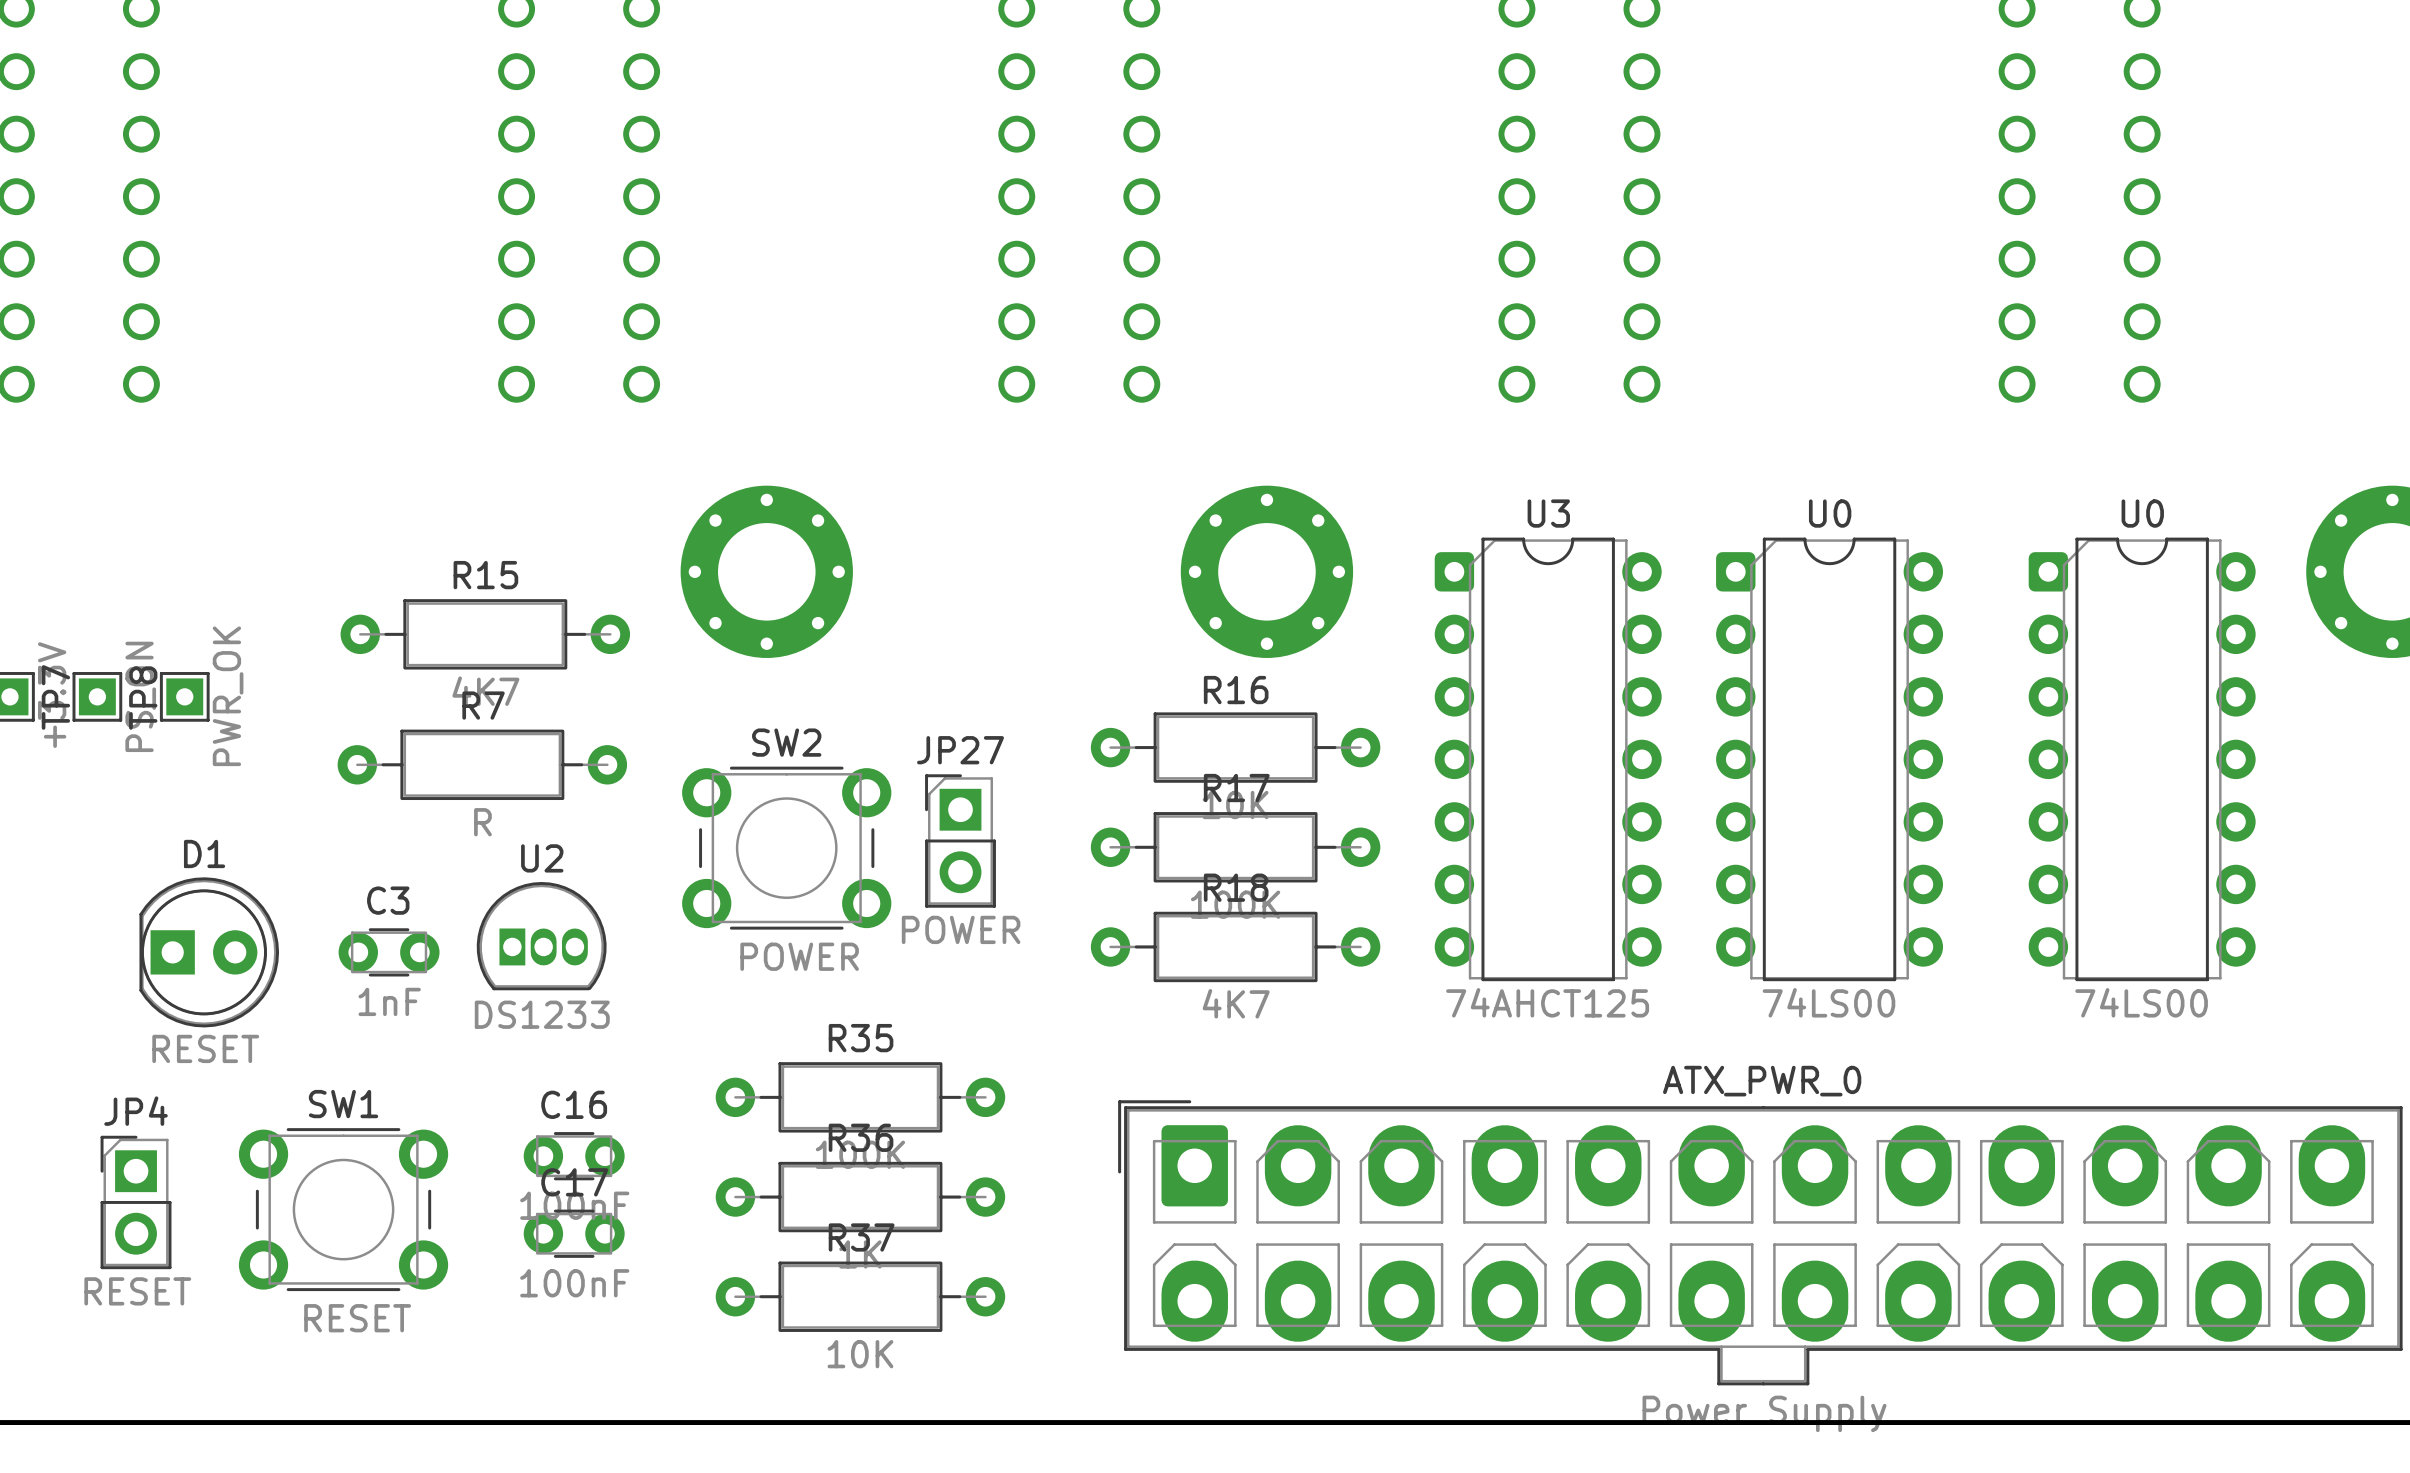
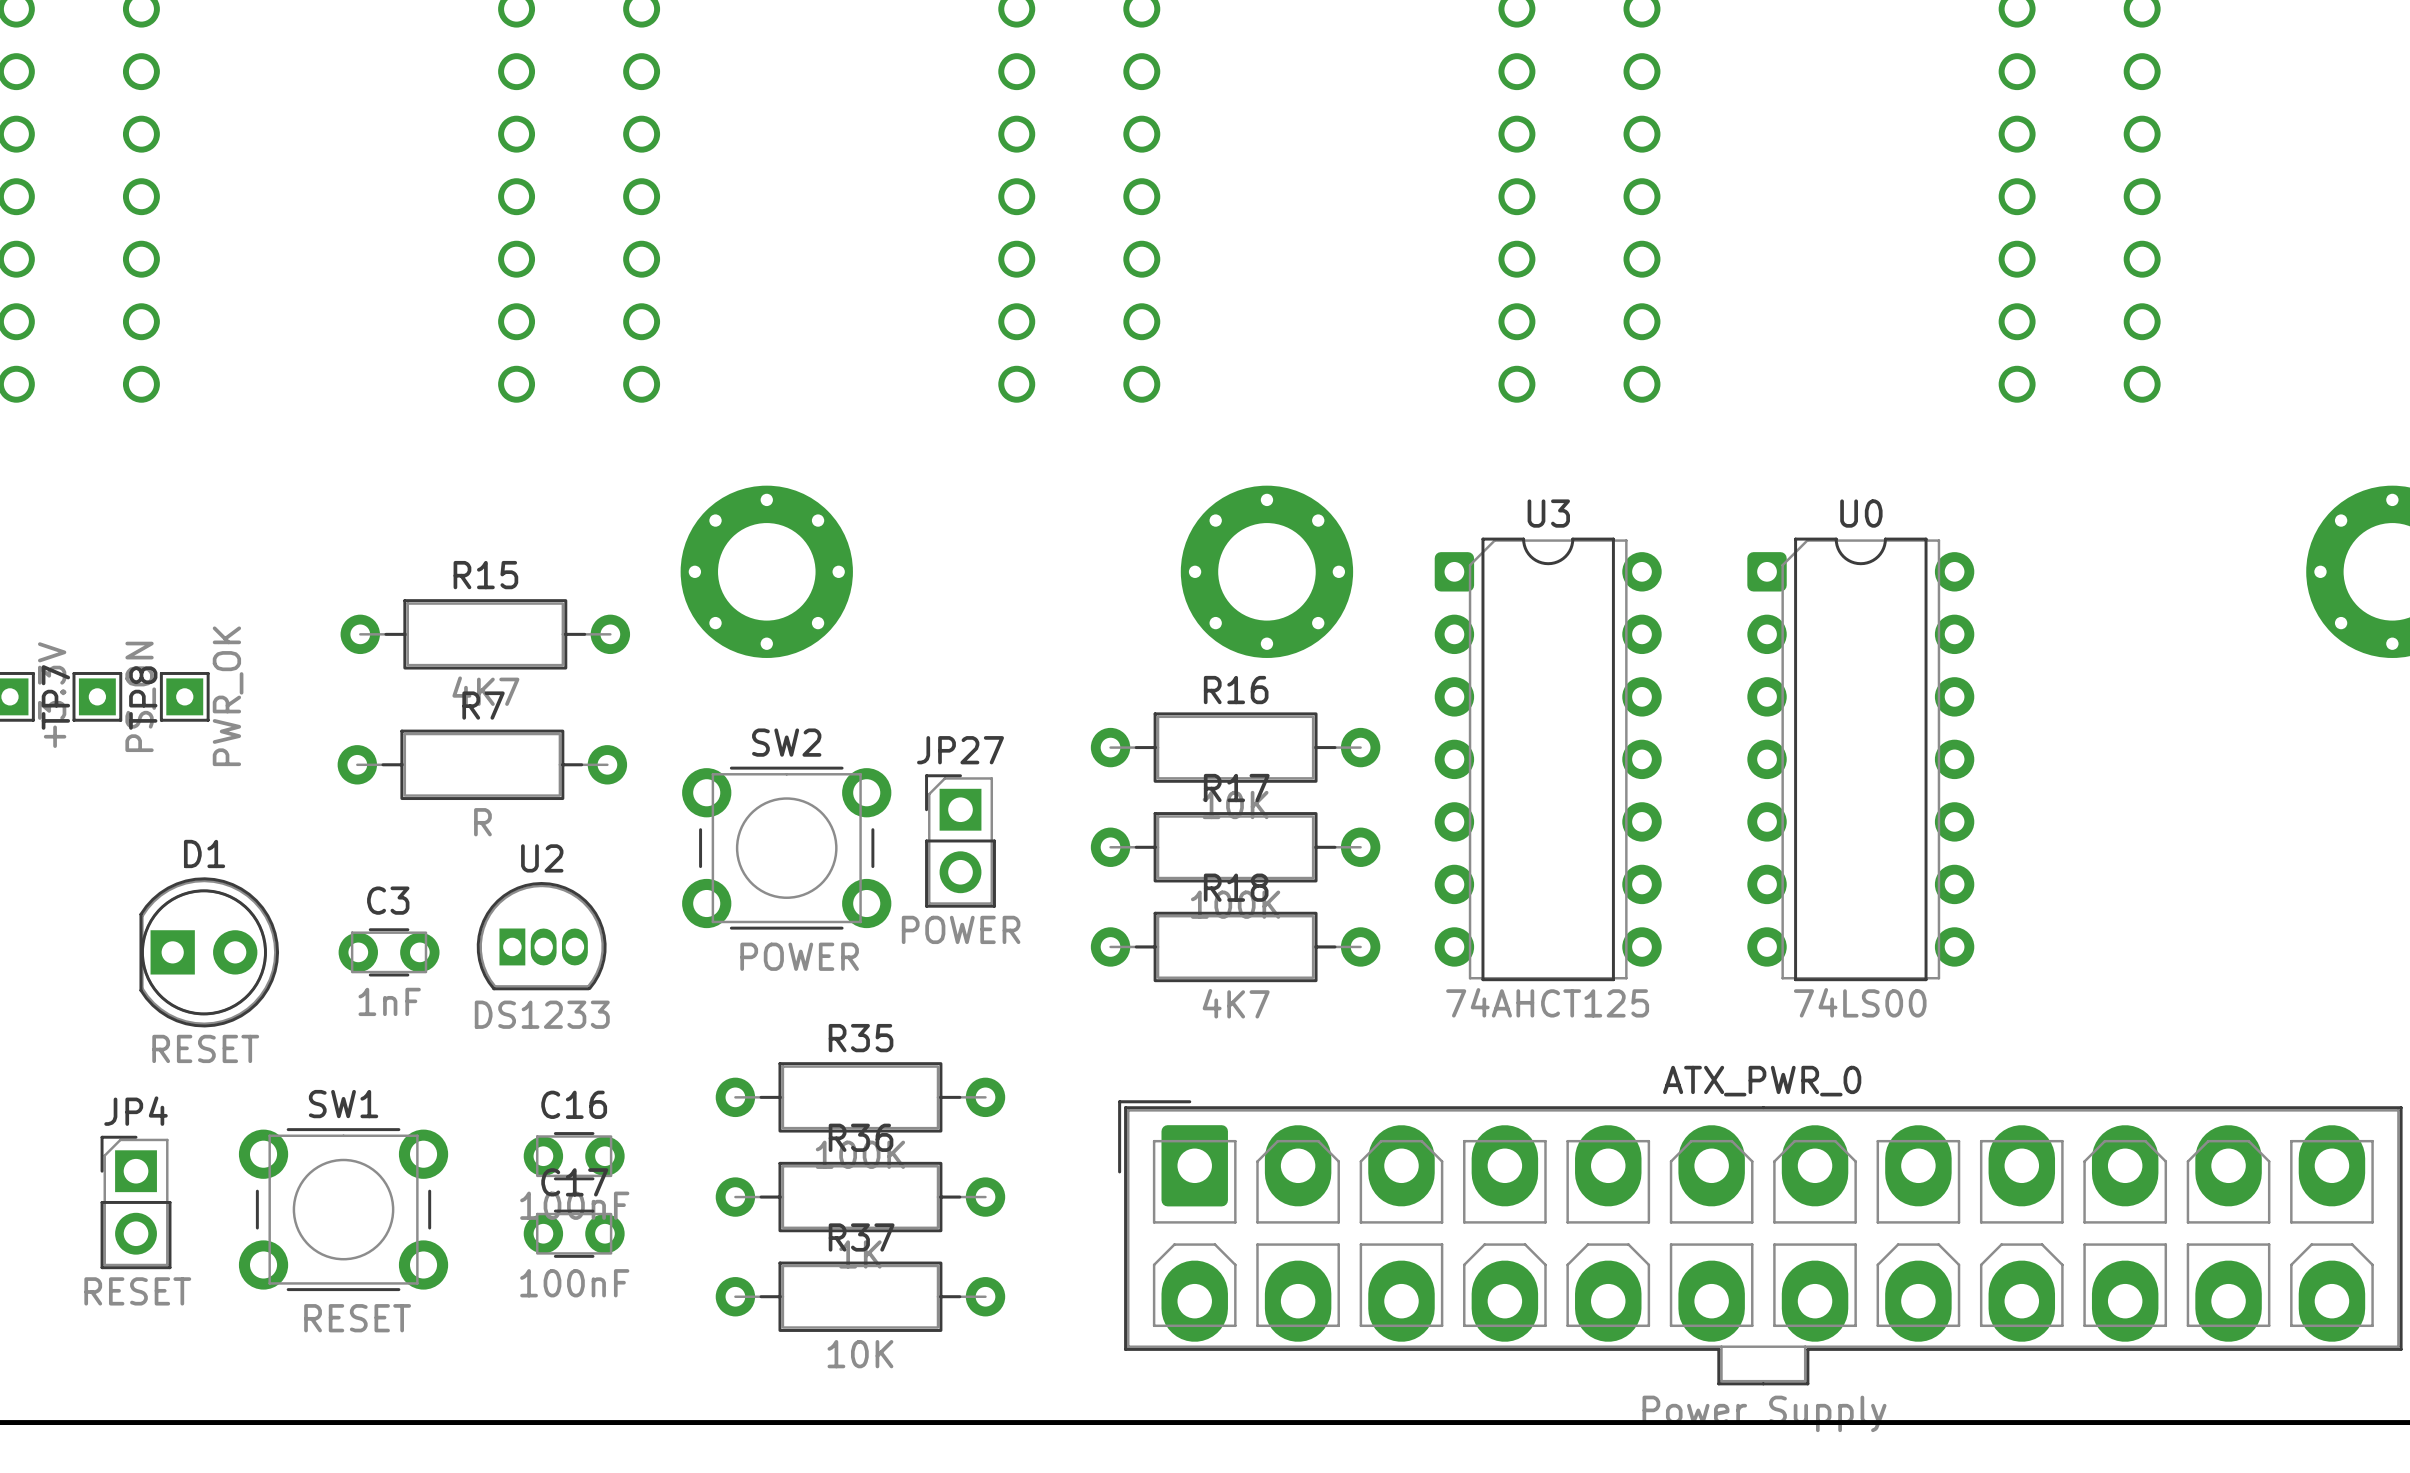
U0 position: (1829, 759) -> (1860, 759)
U0: 74LS00 (2142, 759) -> none

